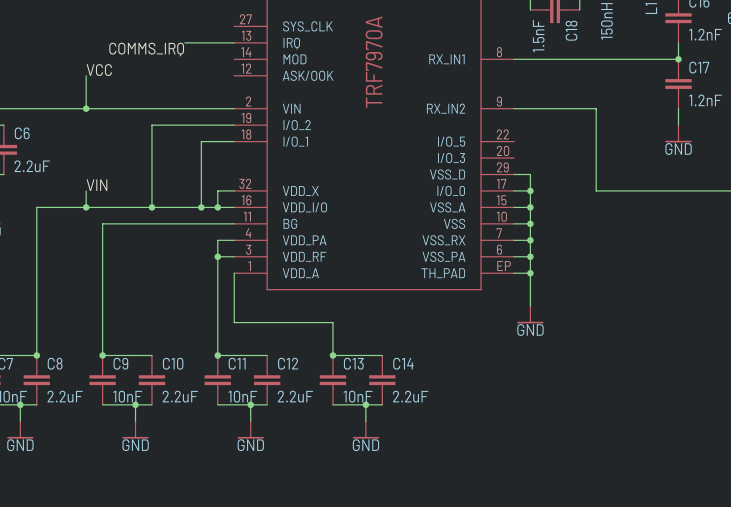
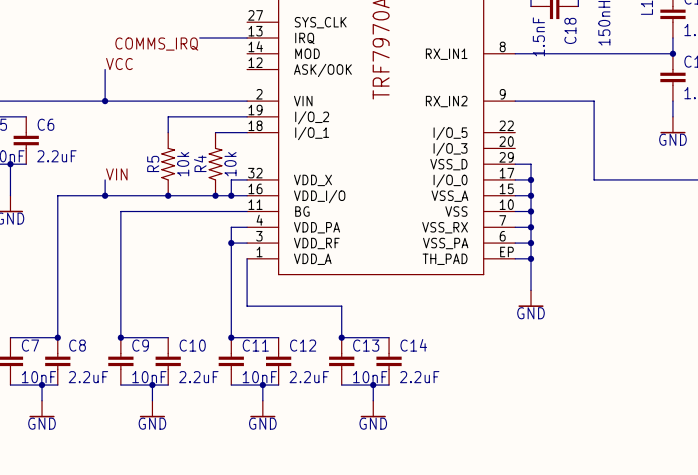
R5: none -> 10k (168, 164)
R4: none -> 10k (215, 164)

